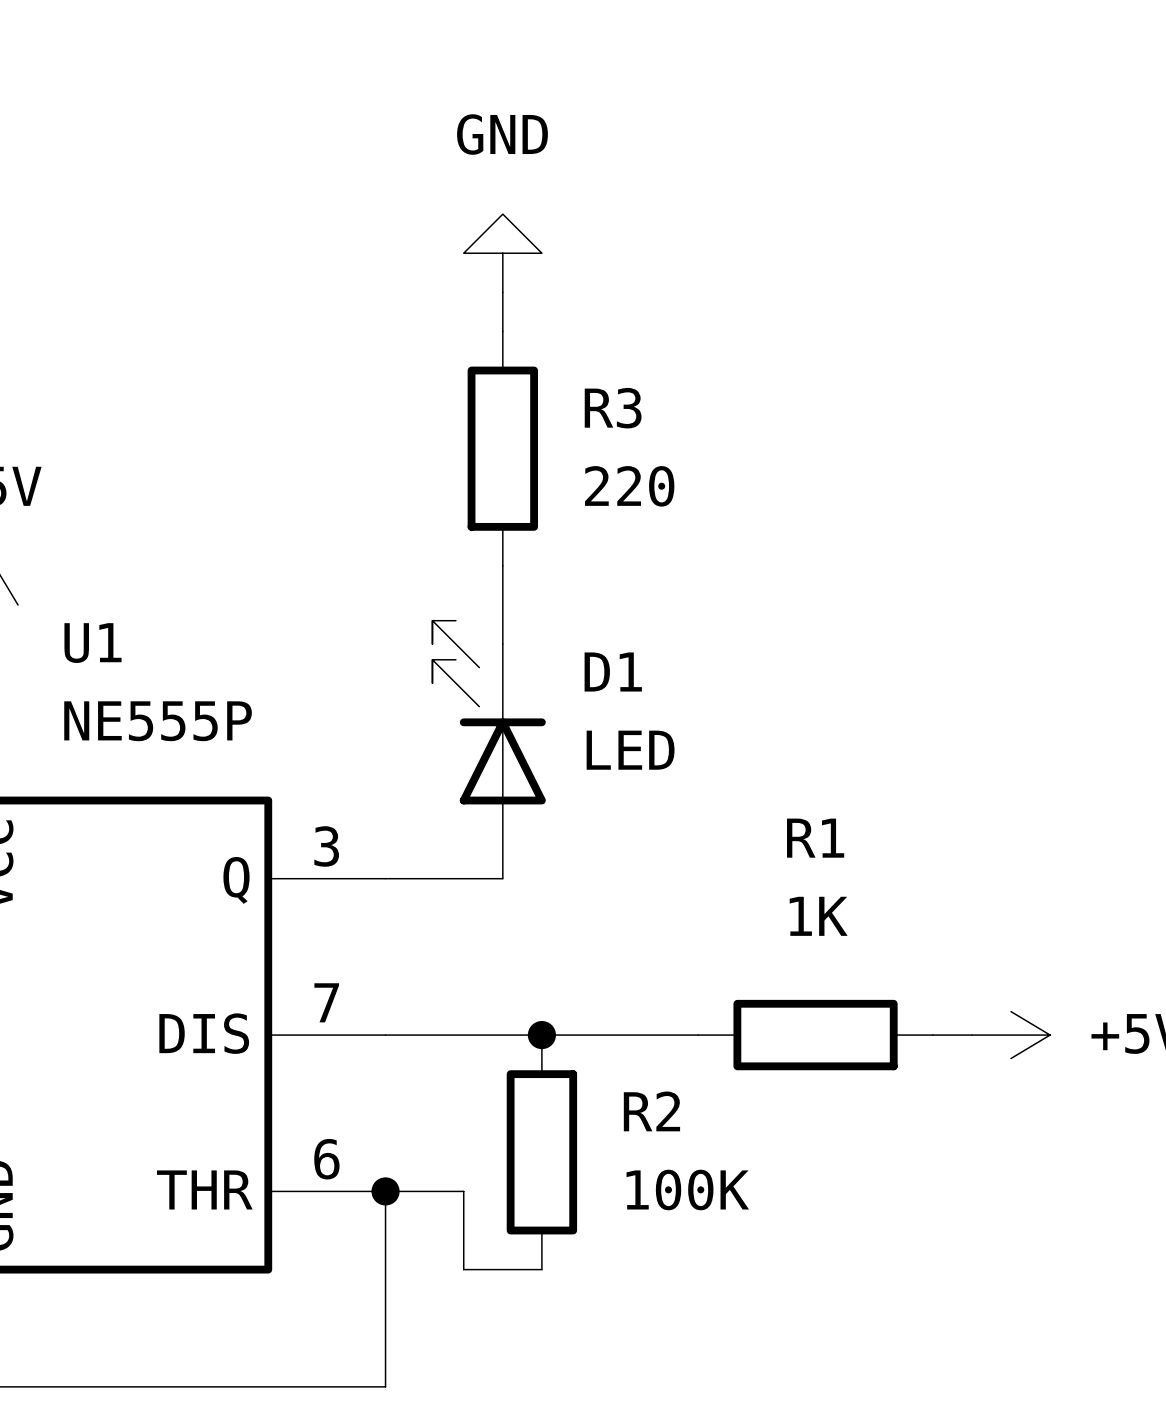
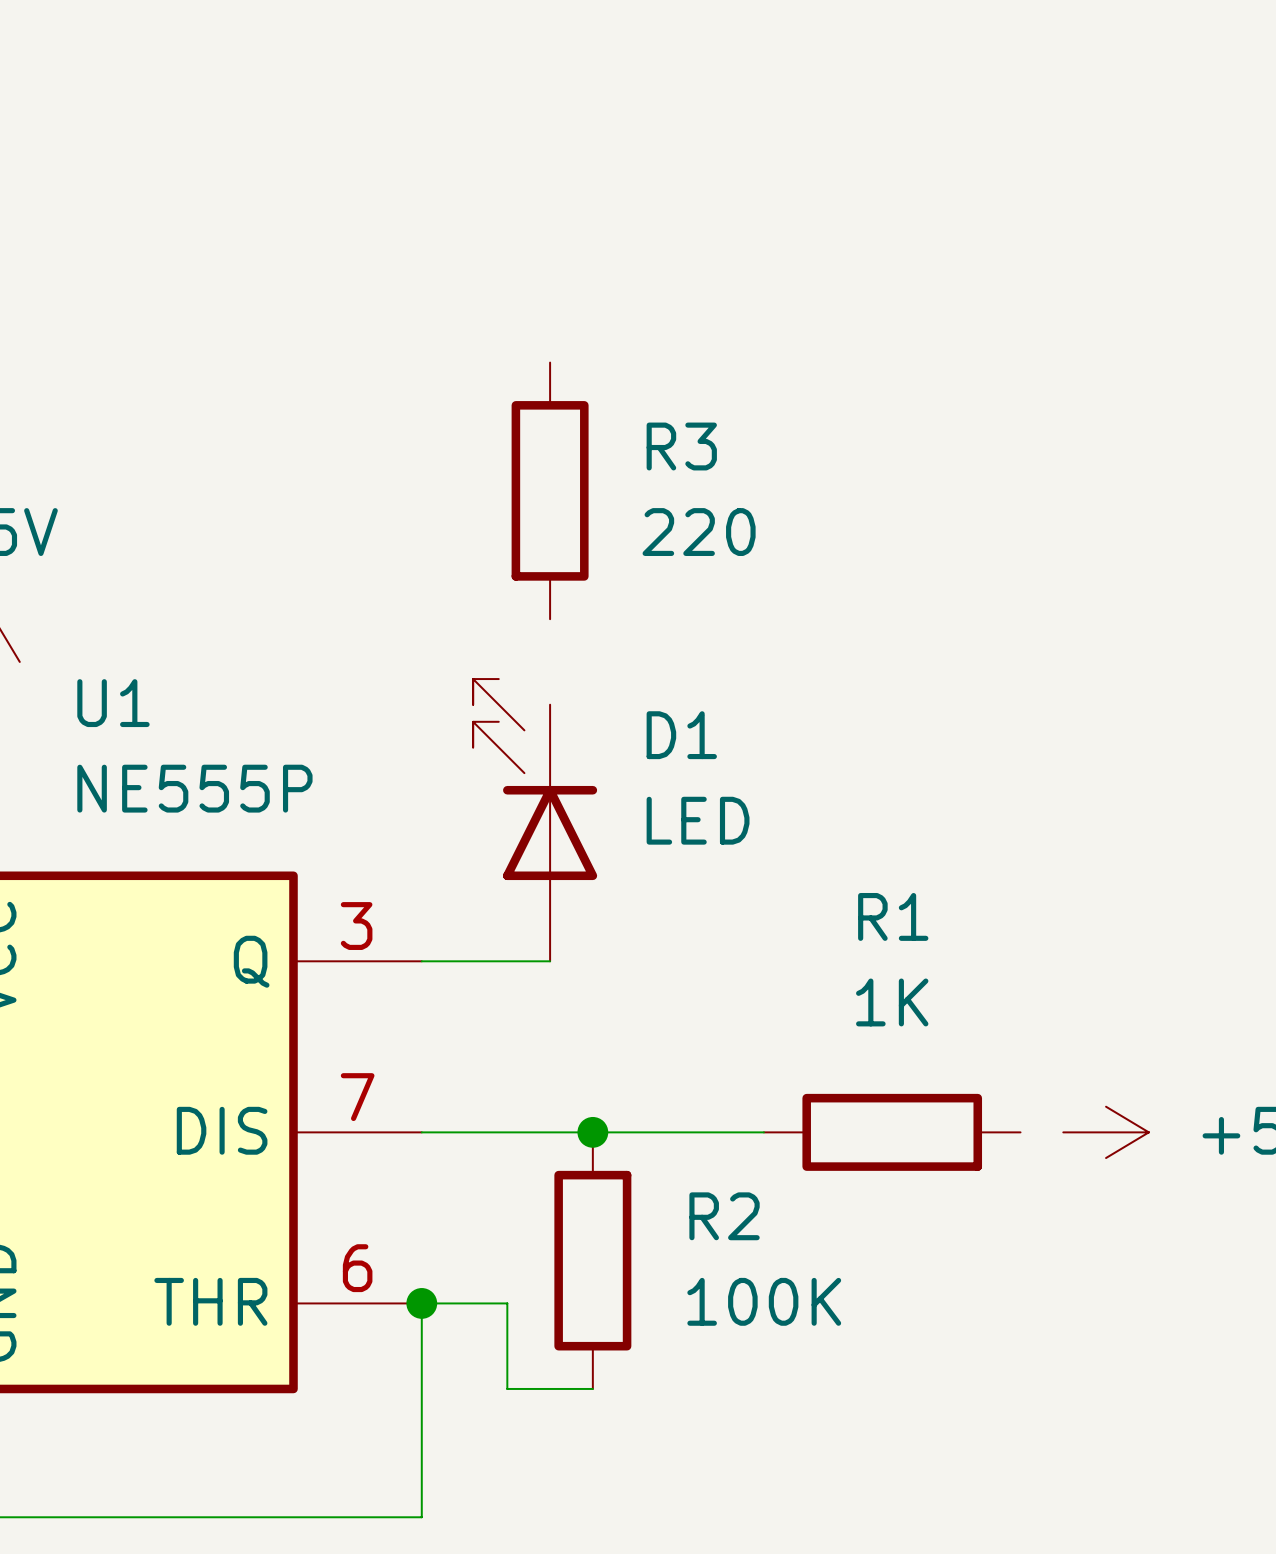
power symbol: GND (502, 253) -> none
wire: (502, 292) (502, 331) -> none
wire: (502, 565) (502, 644) -> none
wire: (932, 1035) (971, 1035) -> none

